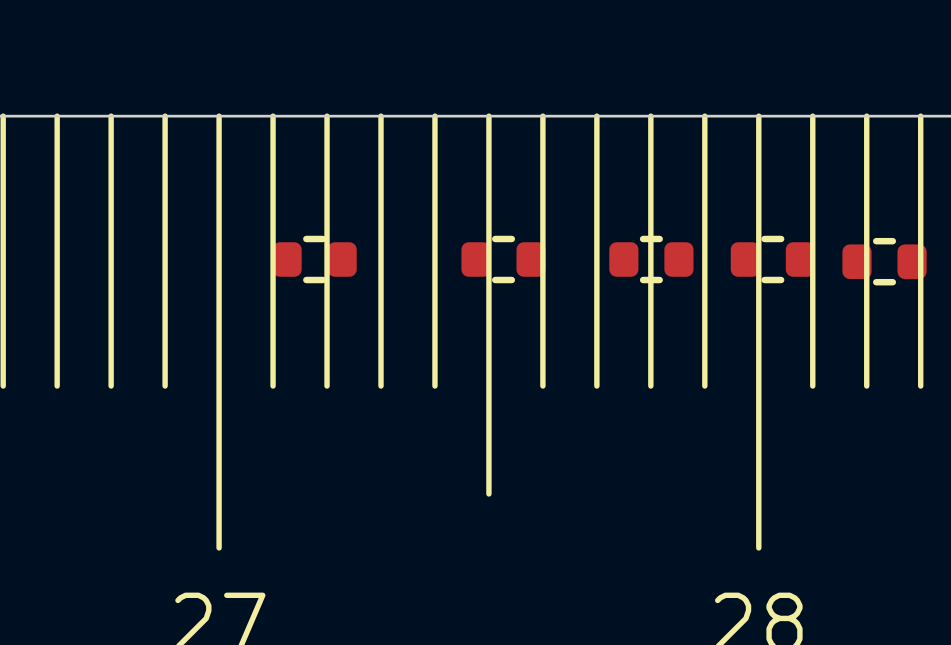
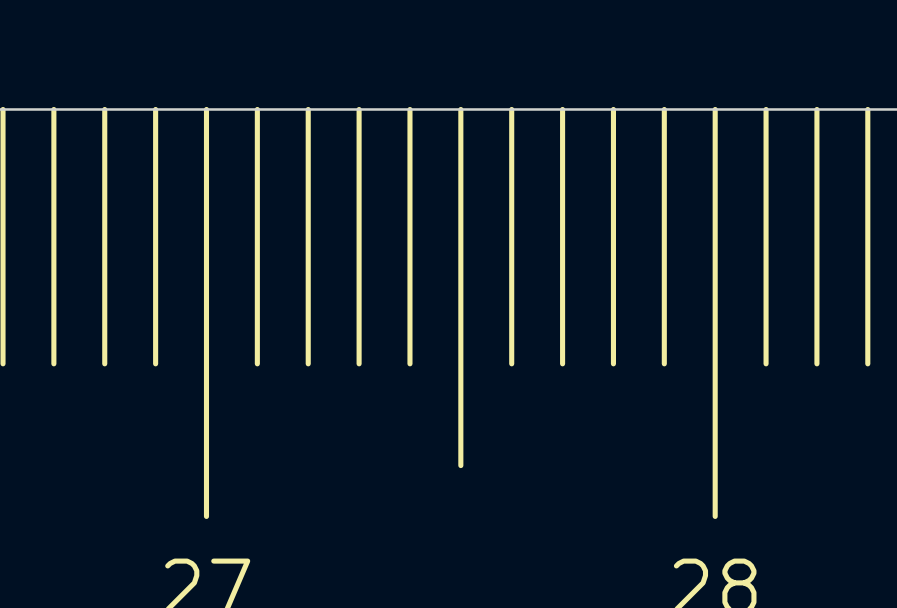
part: (314, 259) -> none
part: (503, 259) -> none
part: (651, 259) -> none
part: (772, 259) -> none
part: (884, 261) -> none

